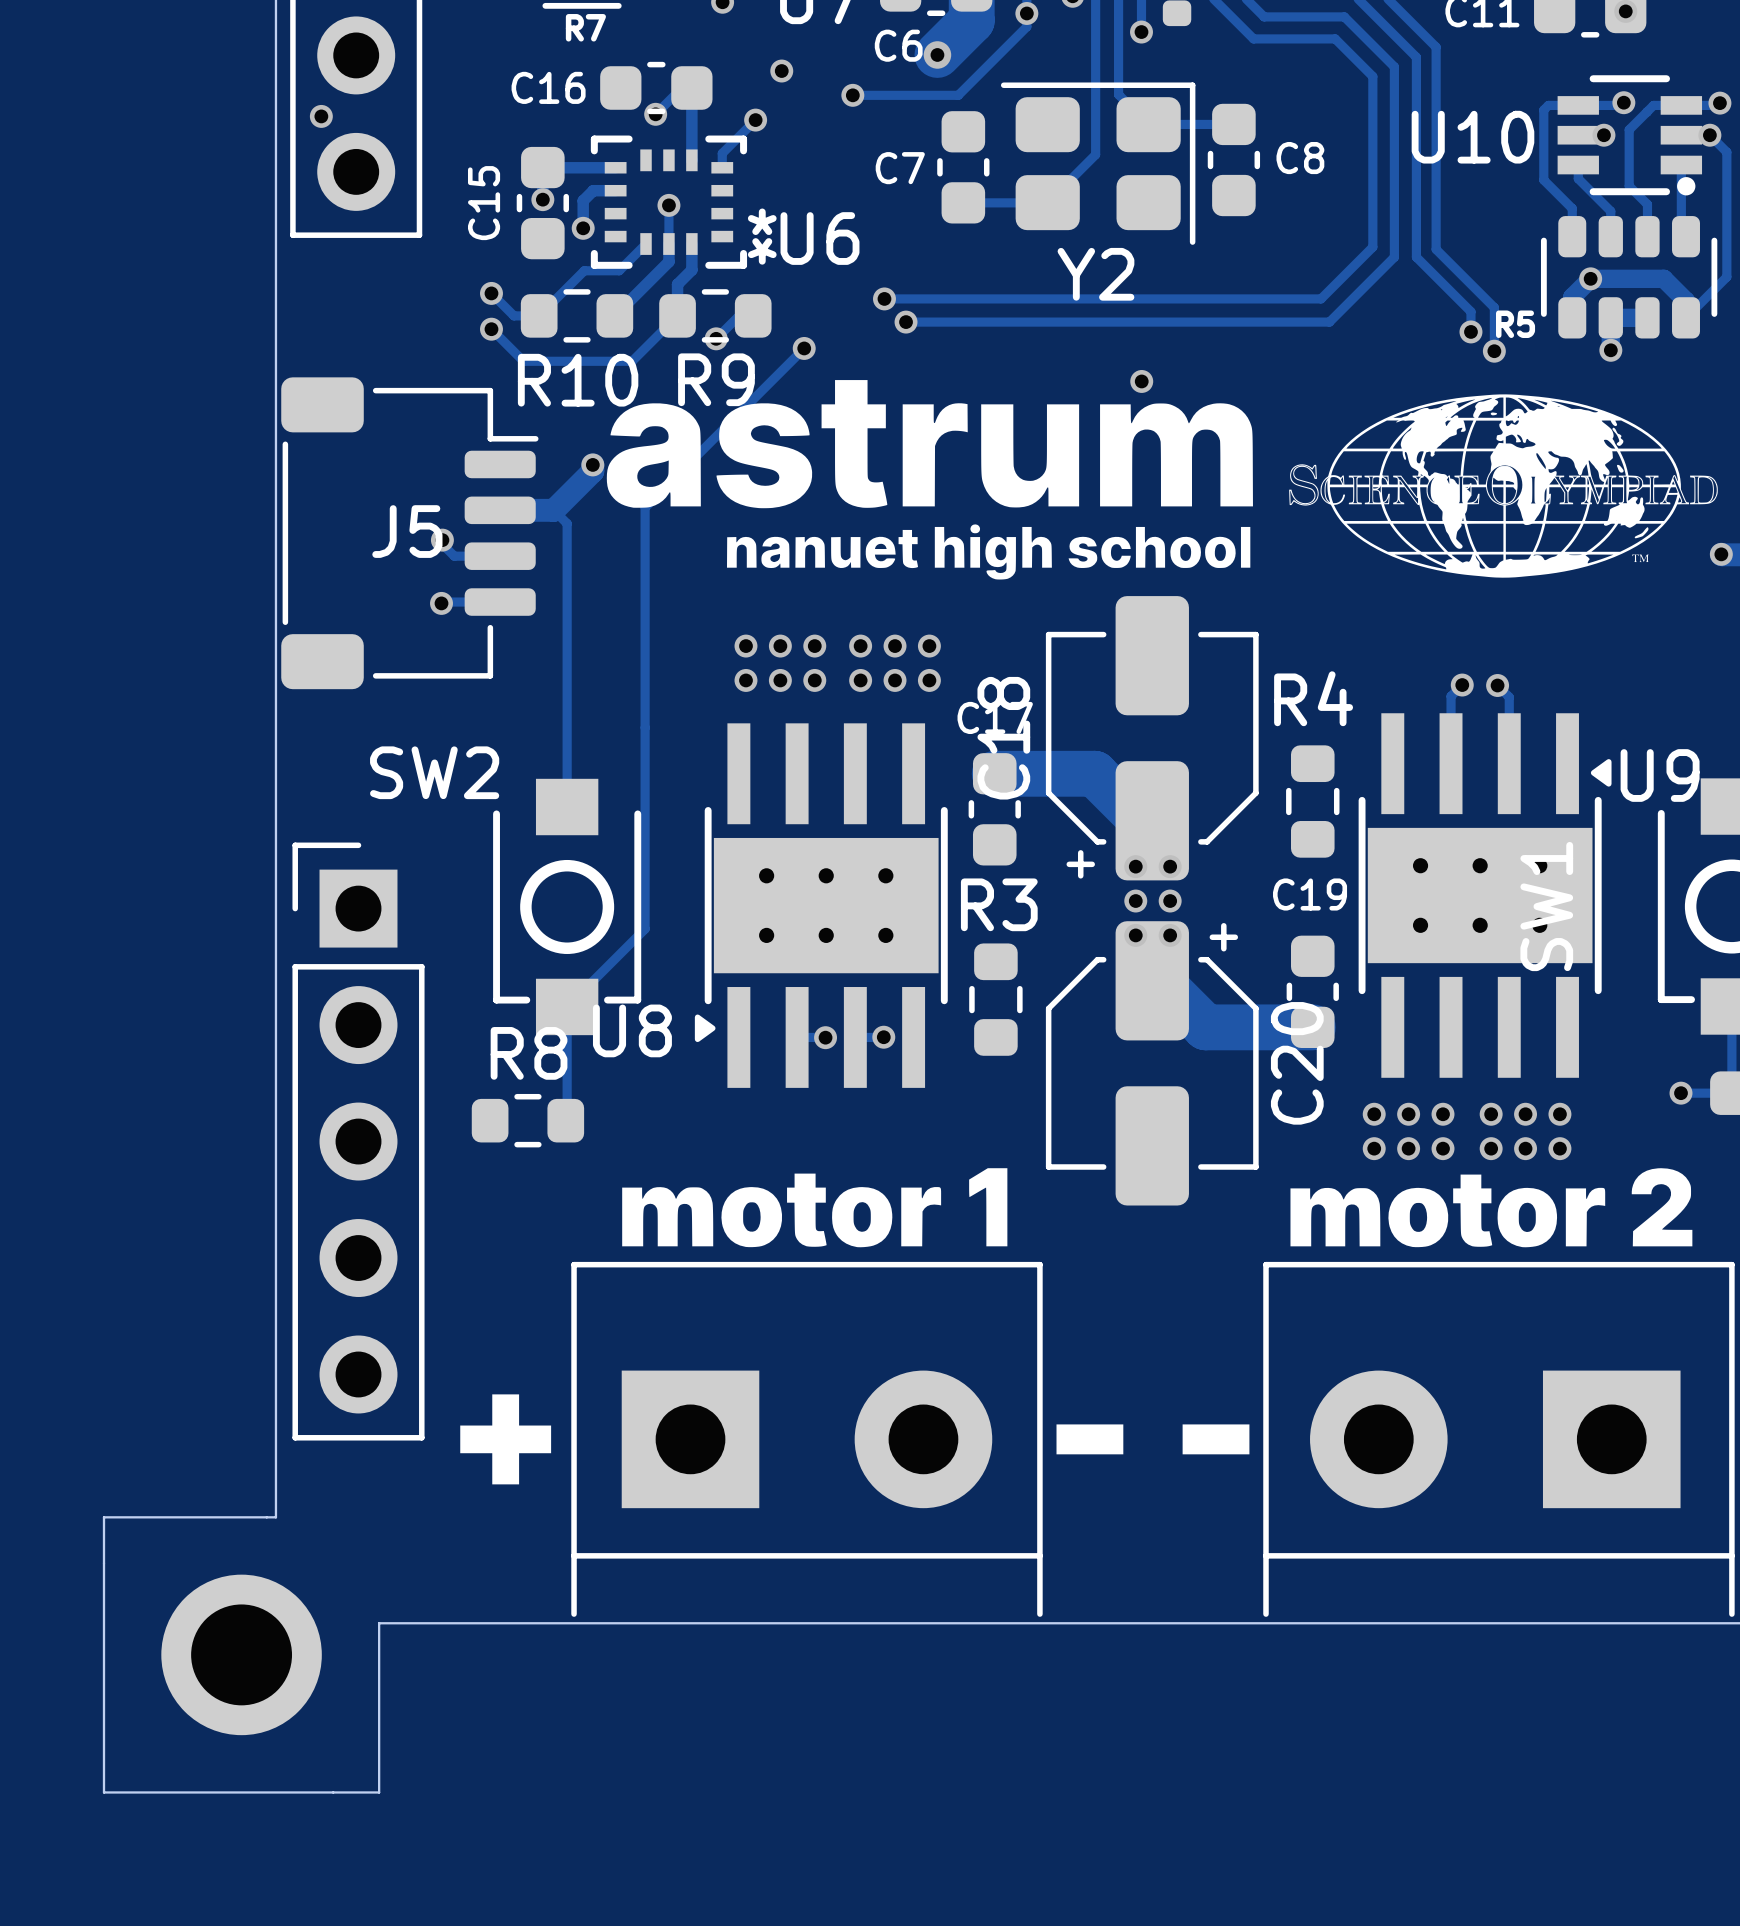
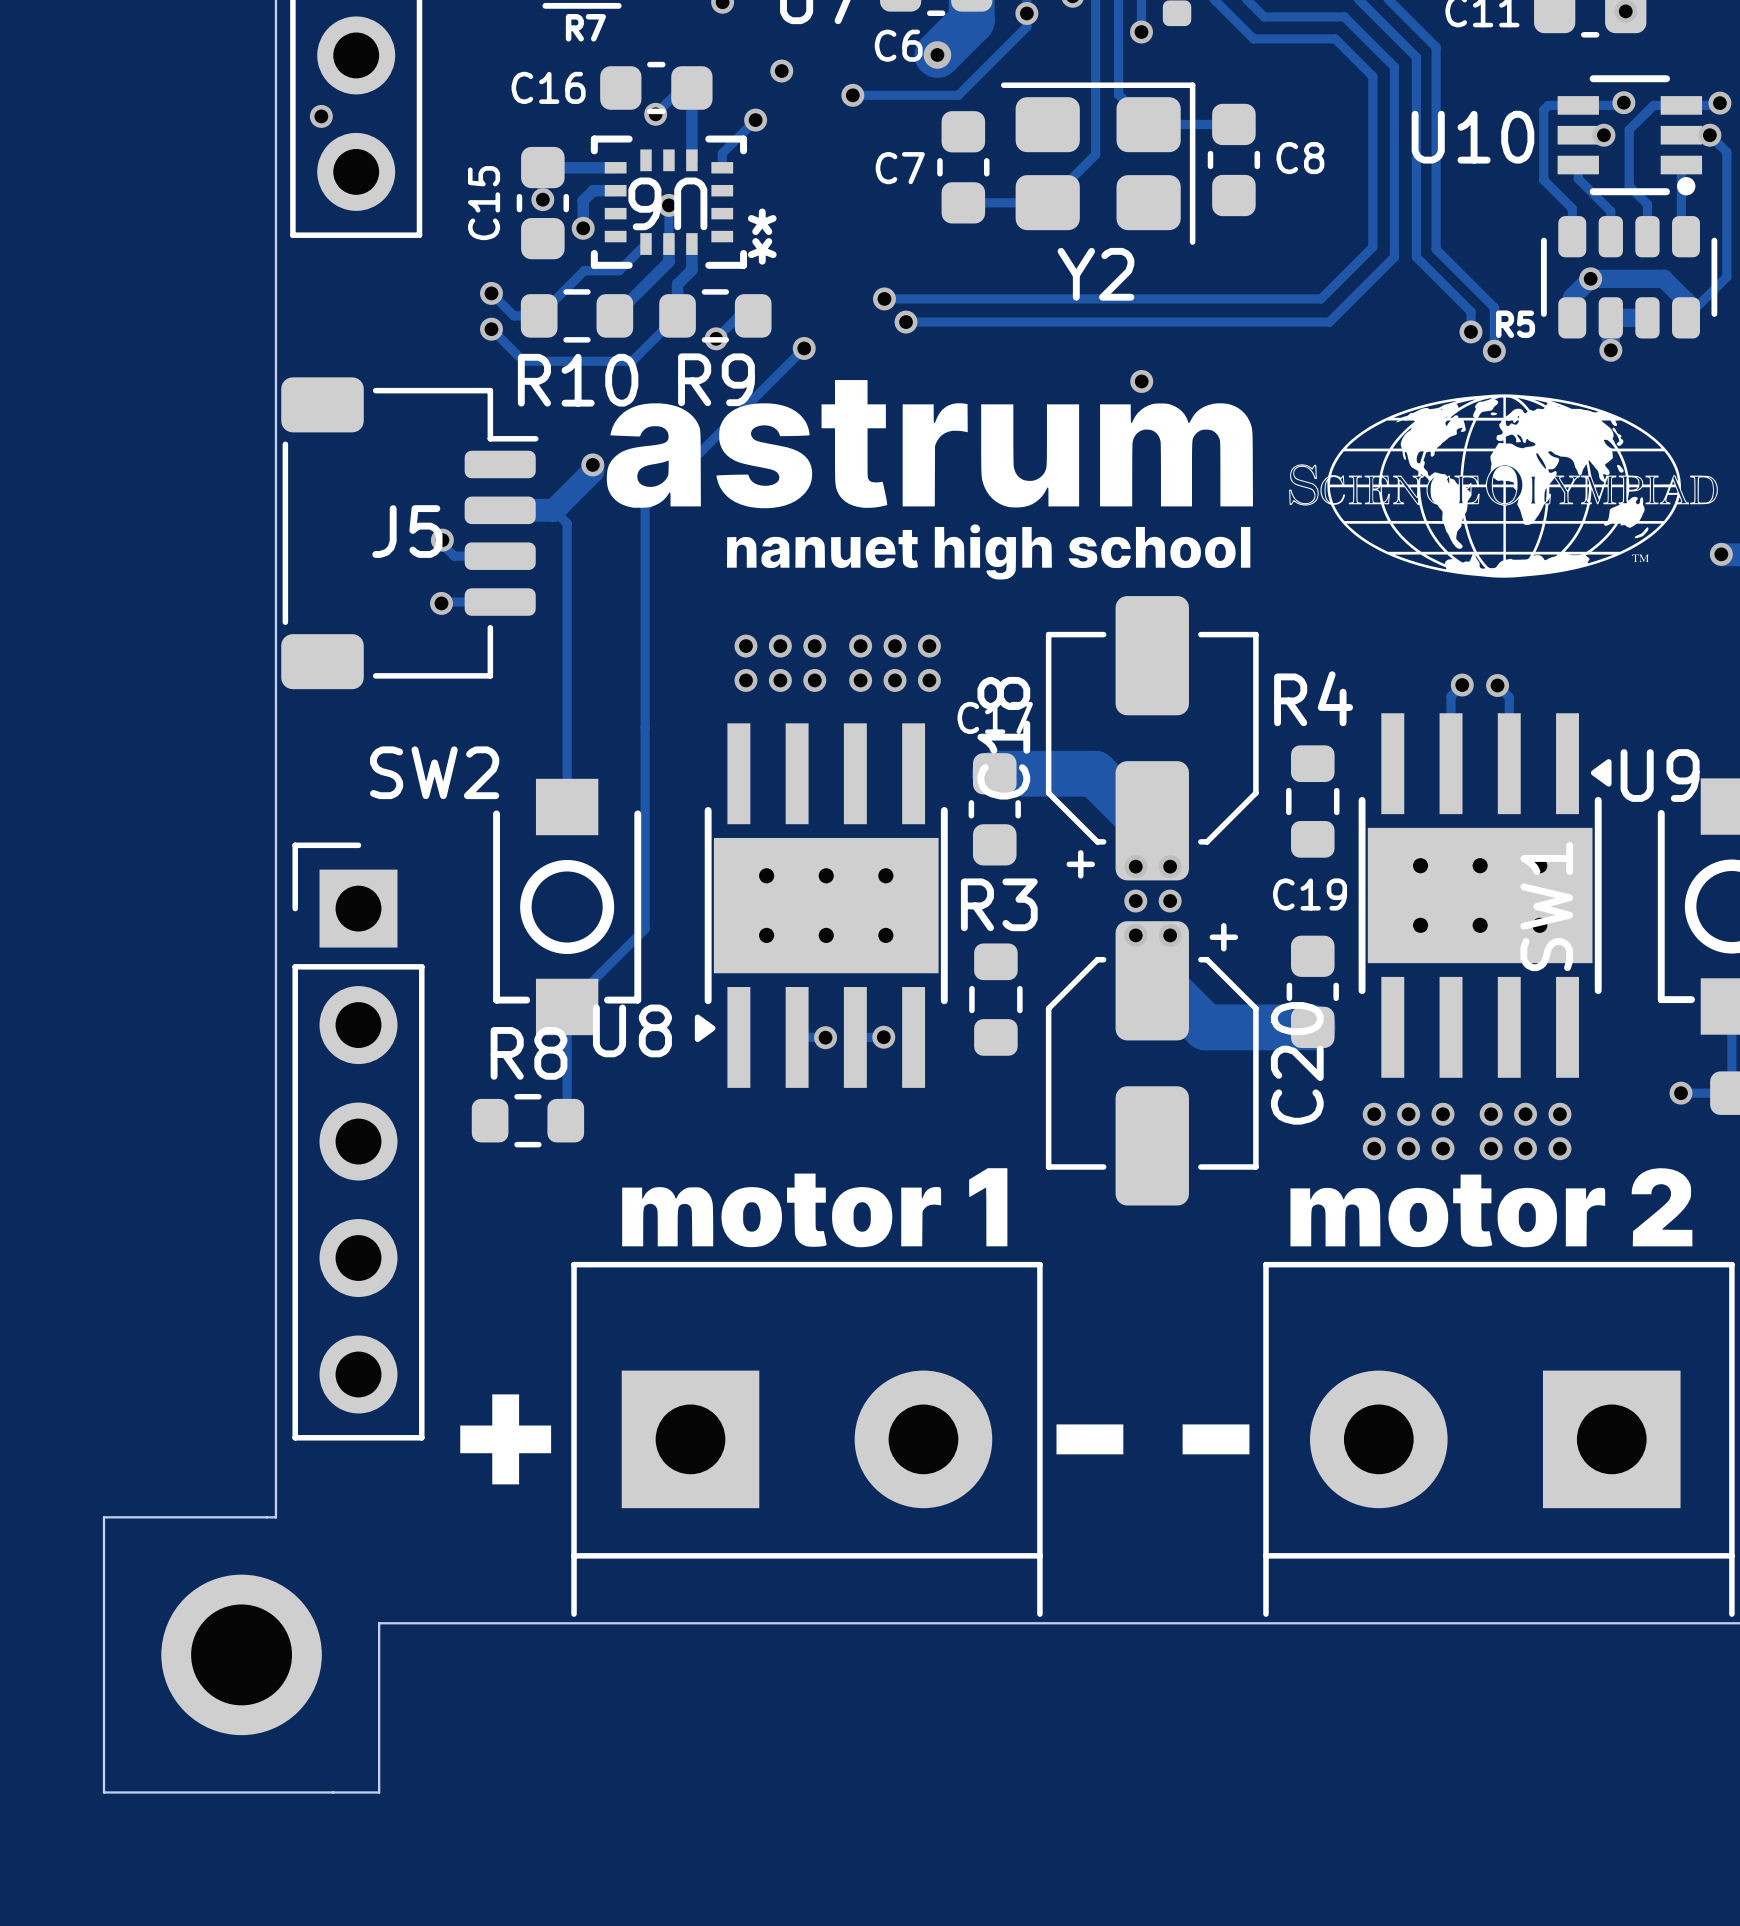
U6 name rotation: 0° (819, 238) -> 180° (667, 203)
U6 name position: U6 (819, 238) -> U6 (667, 203)

